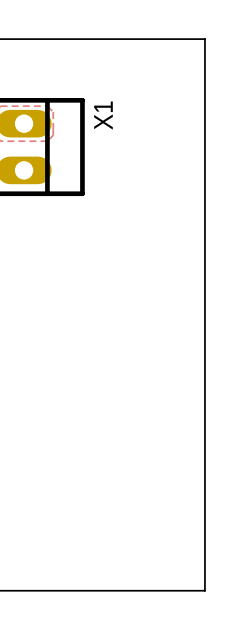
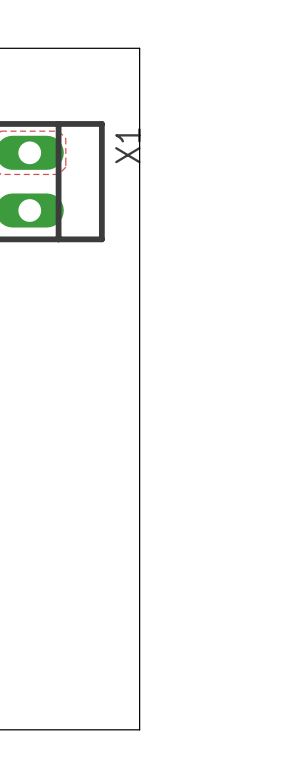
board edge: (113, 39) (204, 39) (204, 590) (113, 590) -> (139, 48) (139, 729)

